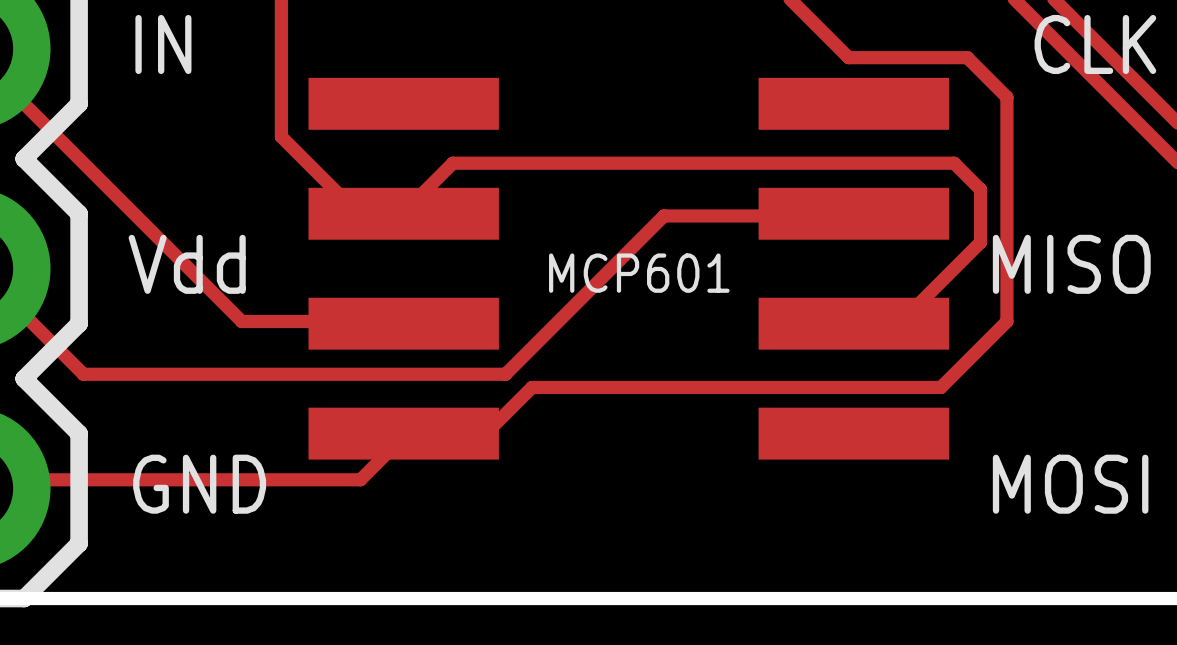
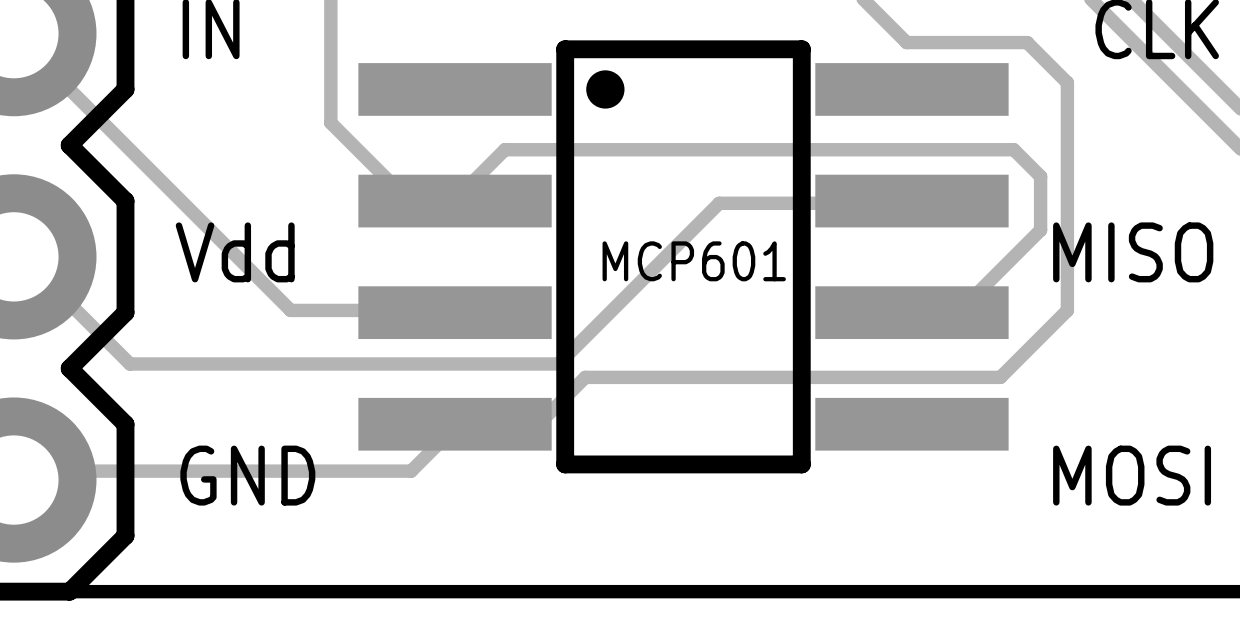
line: none -> (565, 49) (565, 464) (801, 464) (801, 49) (565, 49)
drawing: none -> [586, 70, 625, 109]

